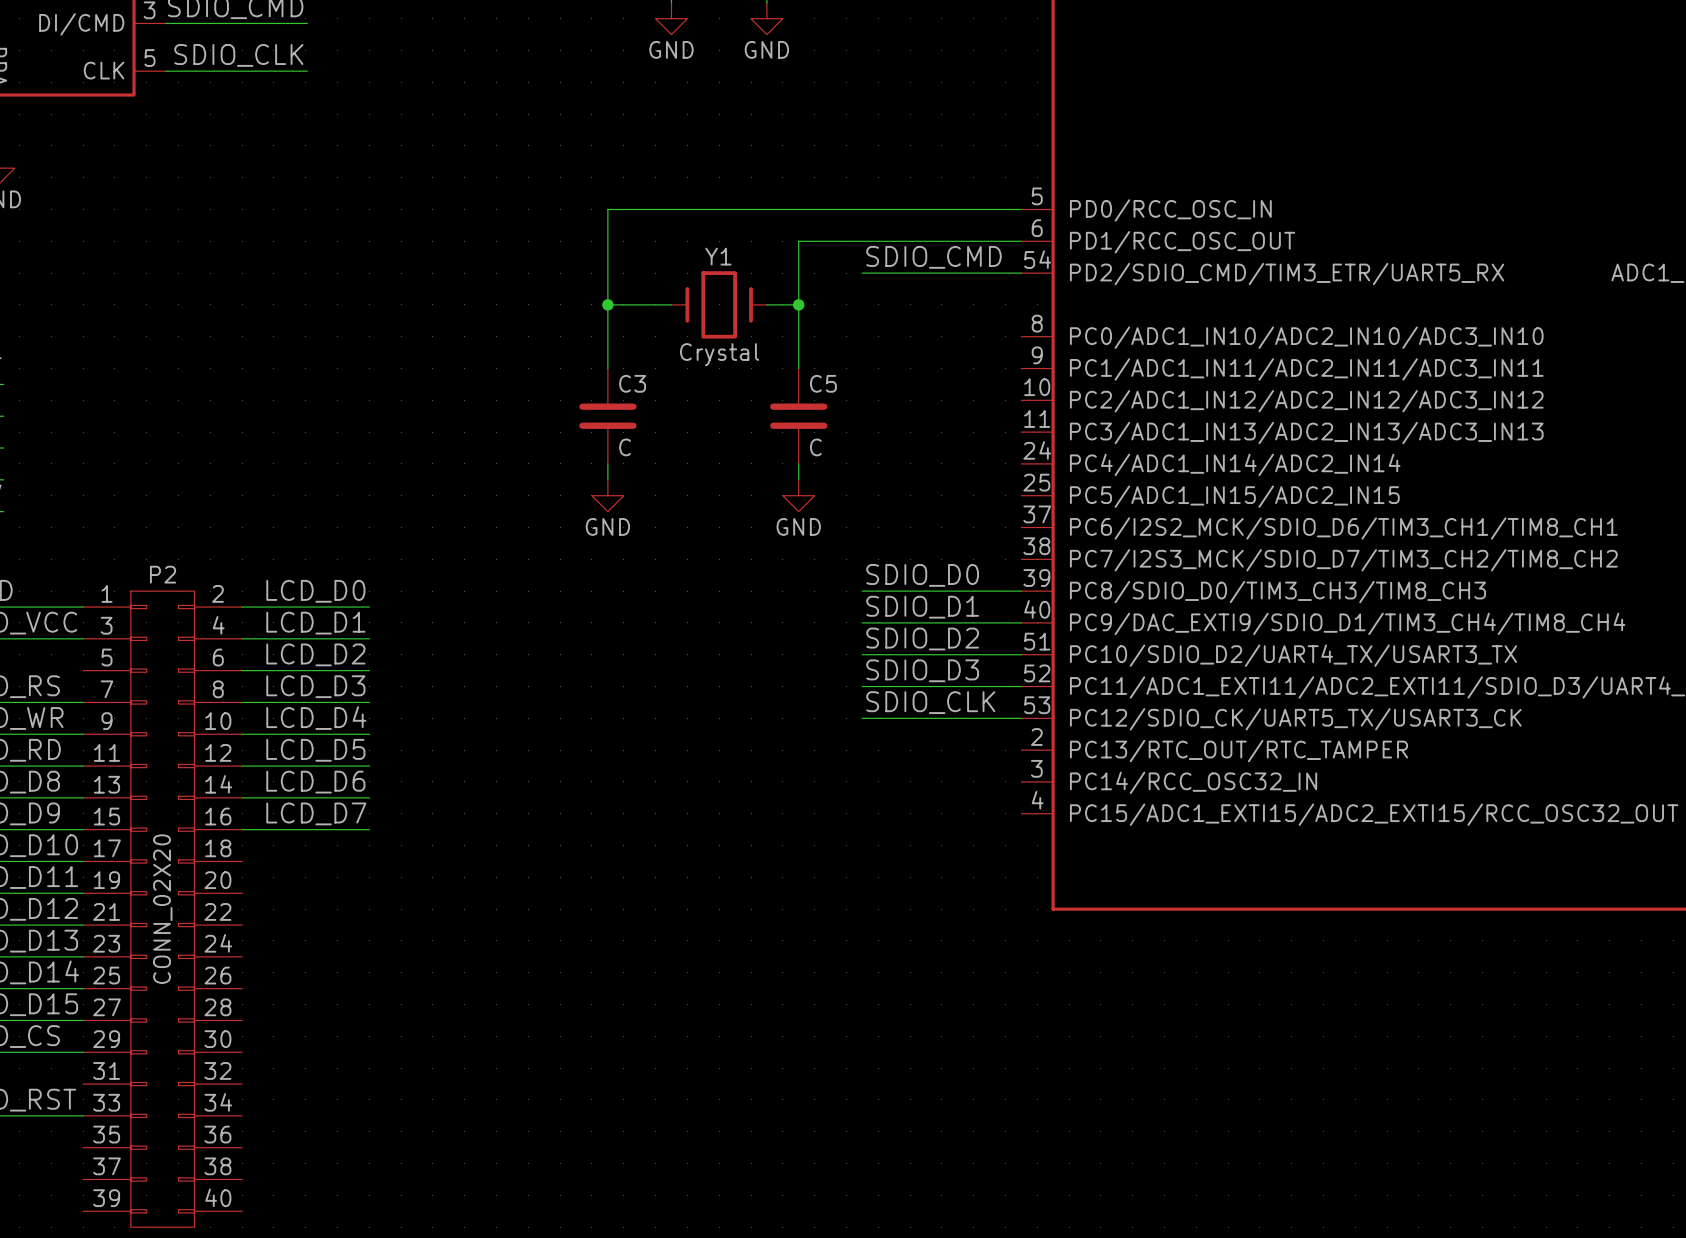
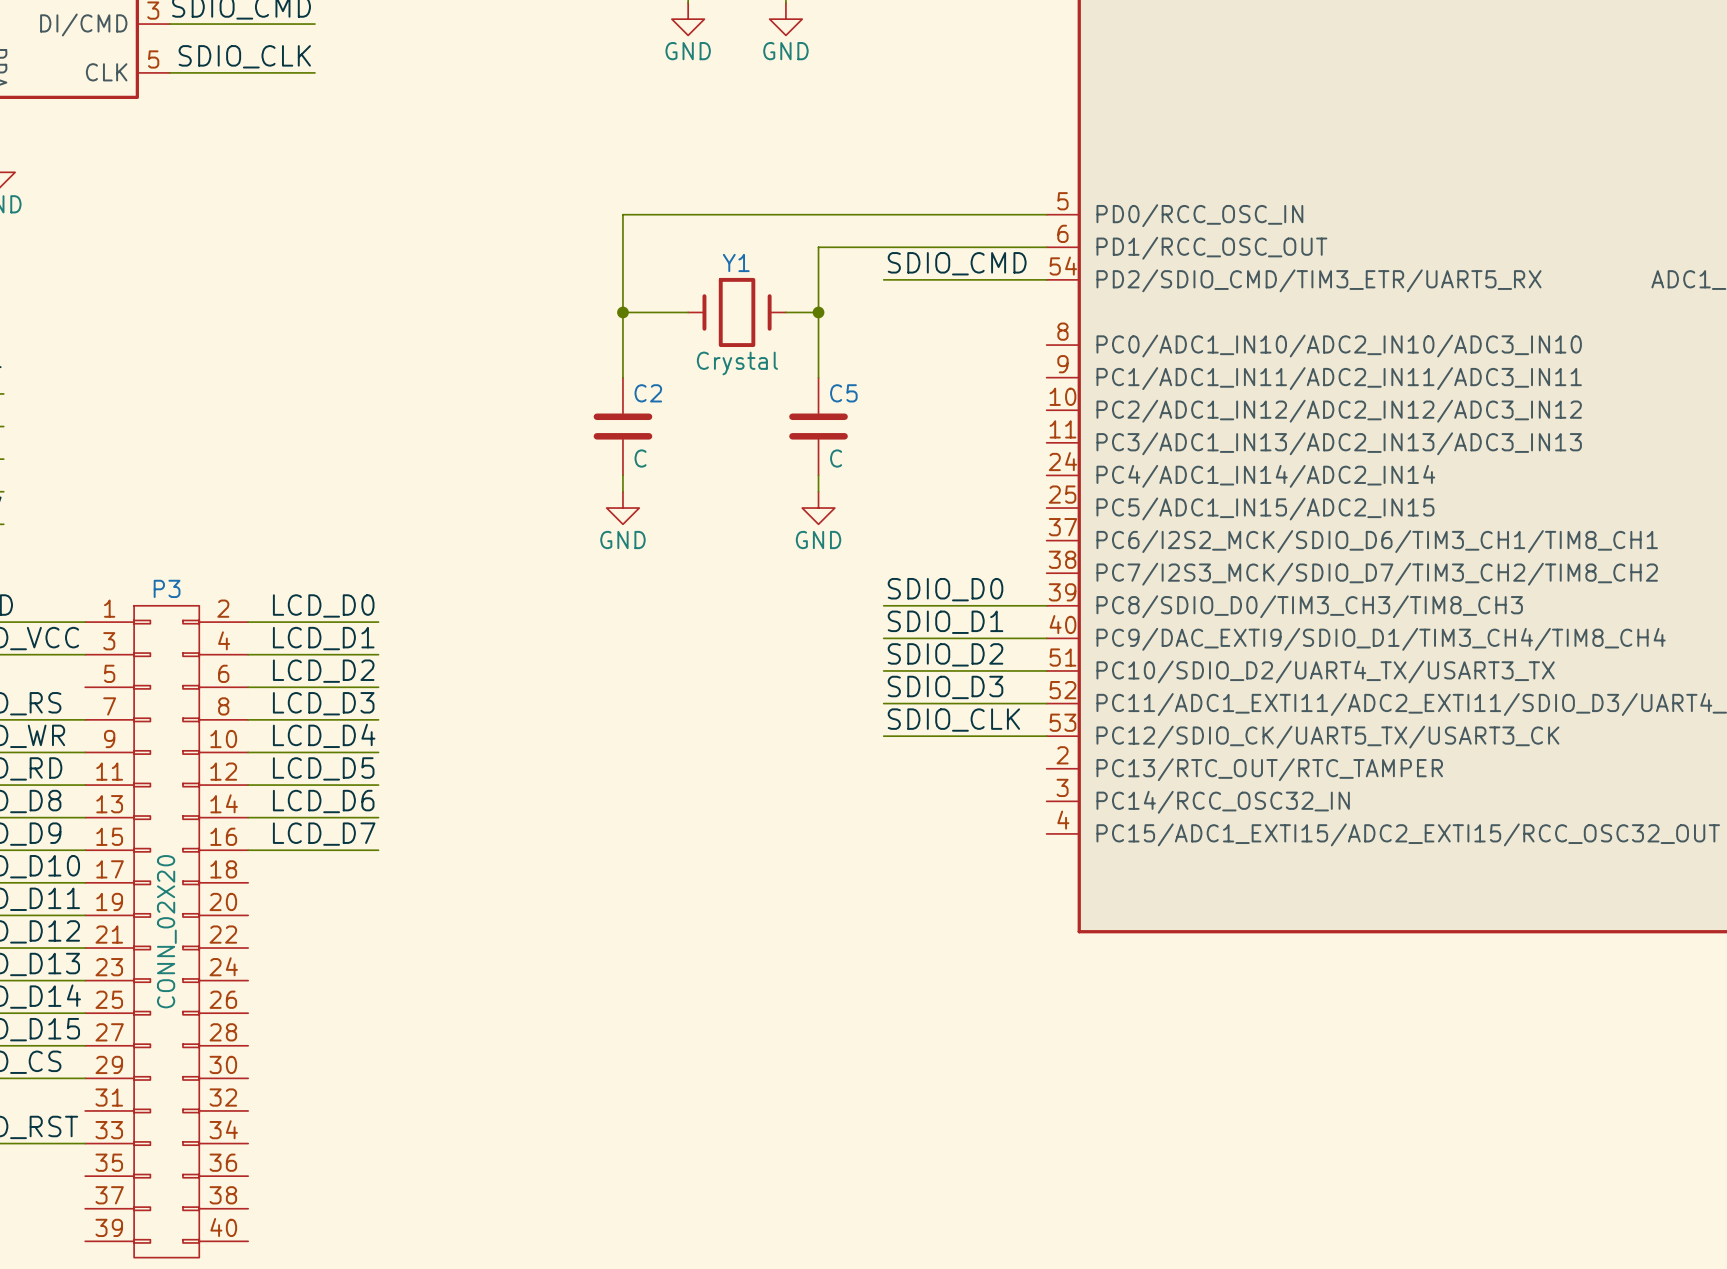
C3 name: C3 (632, 383) -> C2 (648, 393)
P2 name: P2 (163, 574) -> P3 (167, 588)

